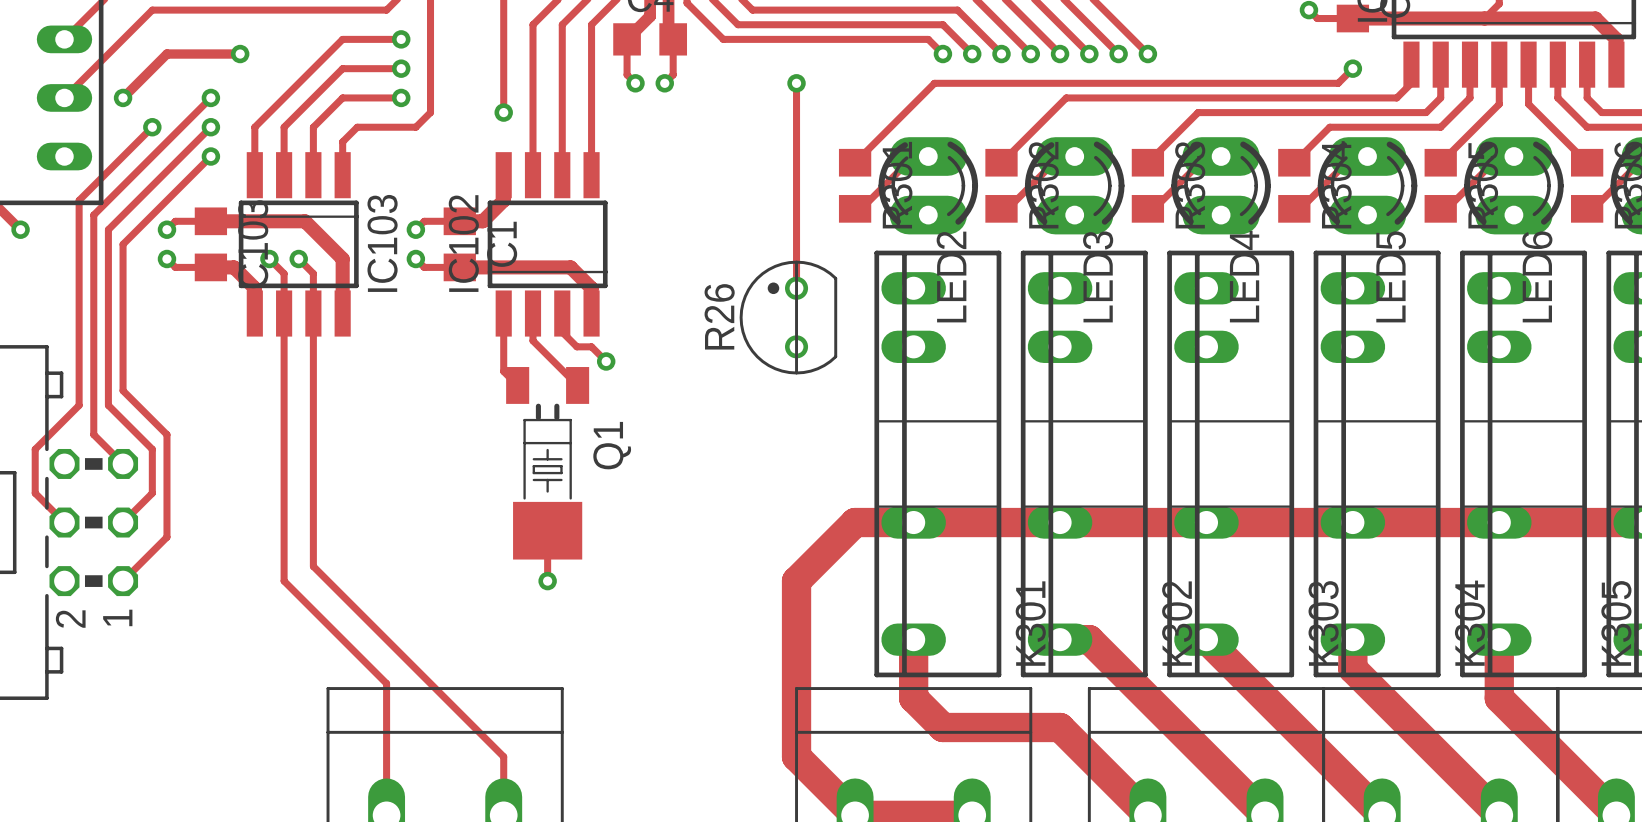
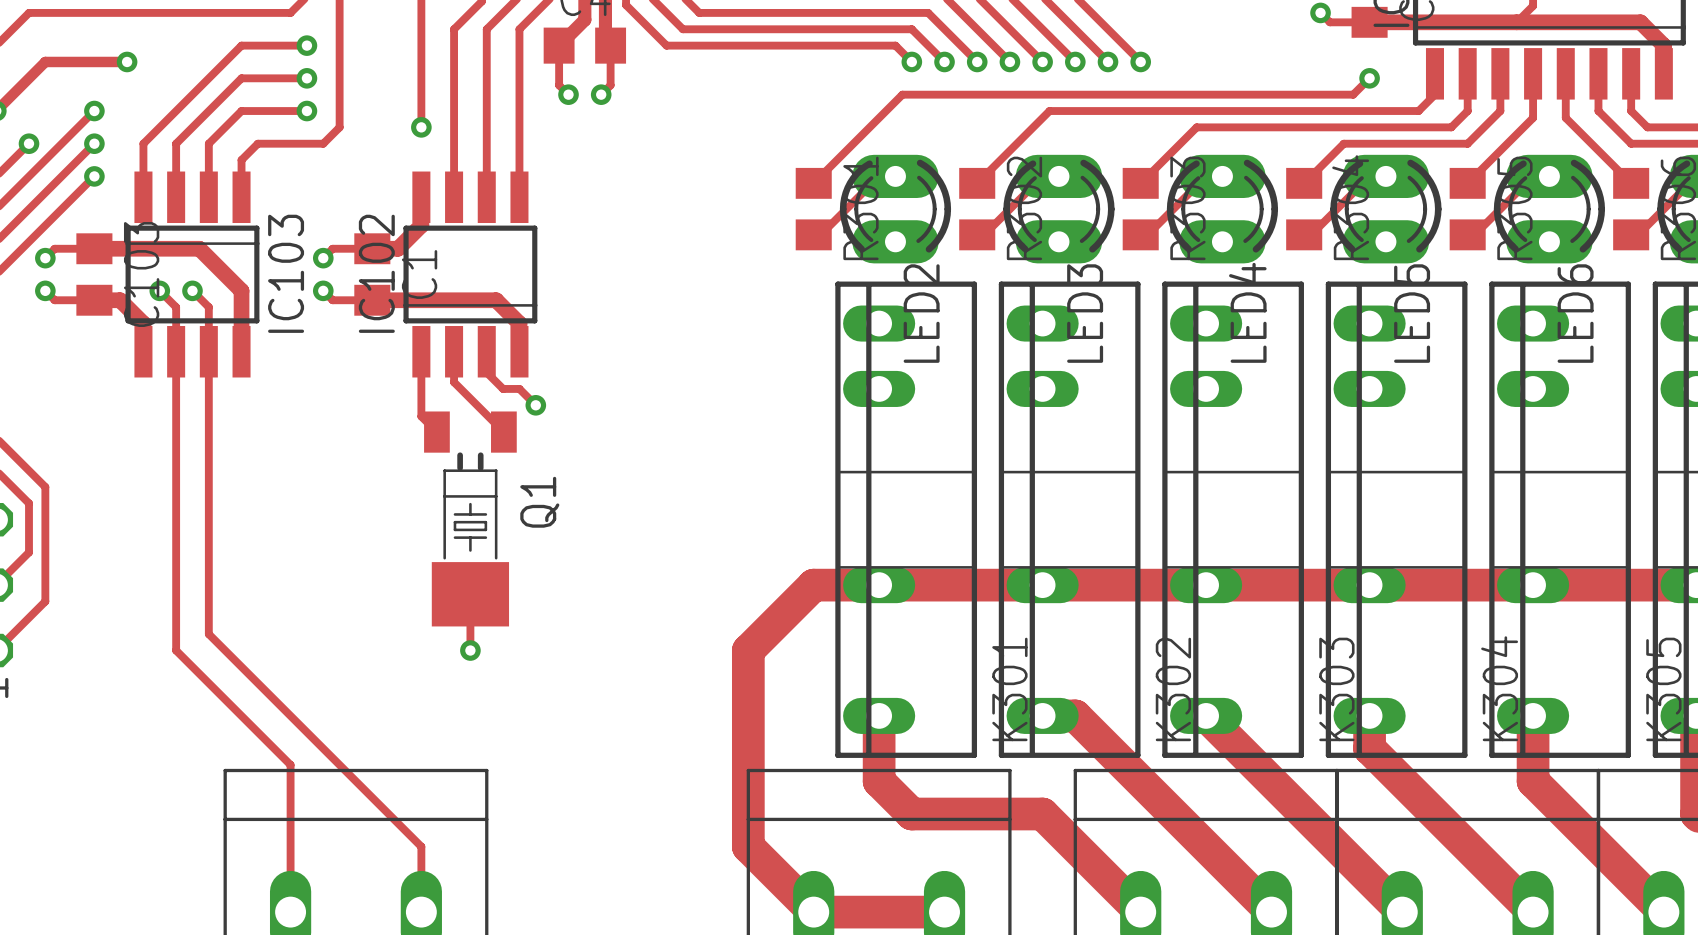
track: (796, 83) (796, 288) -> none
via: (796, 83) -> none
R26: (788, 317) -> none

